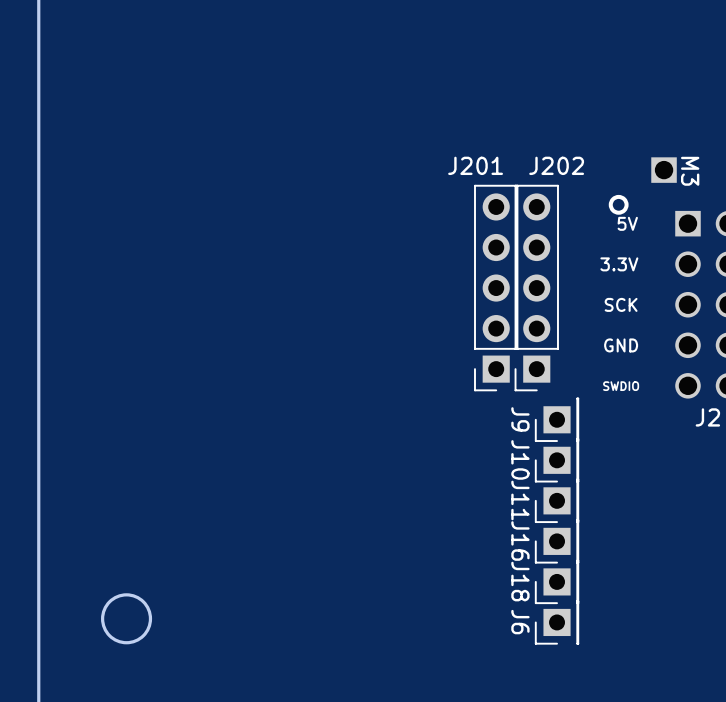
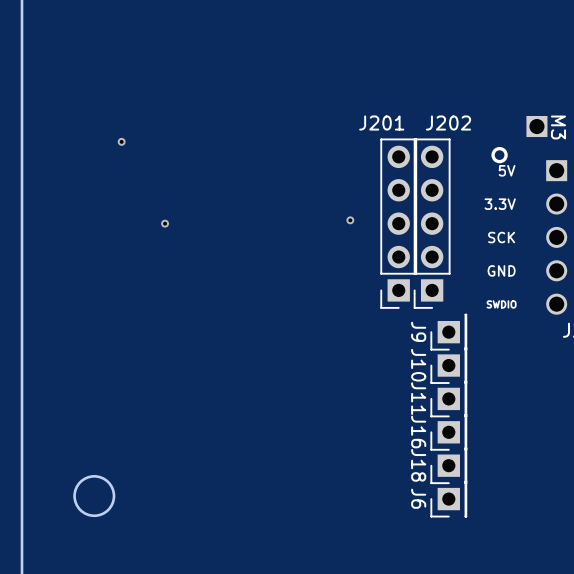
via: none -> (121, 141)
via: none -> (350, 220)
via: none -> (165, 223)

